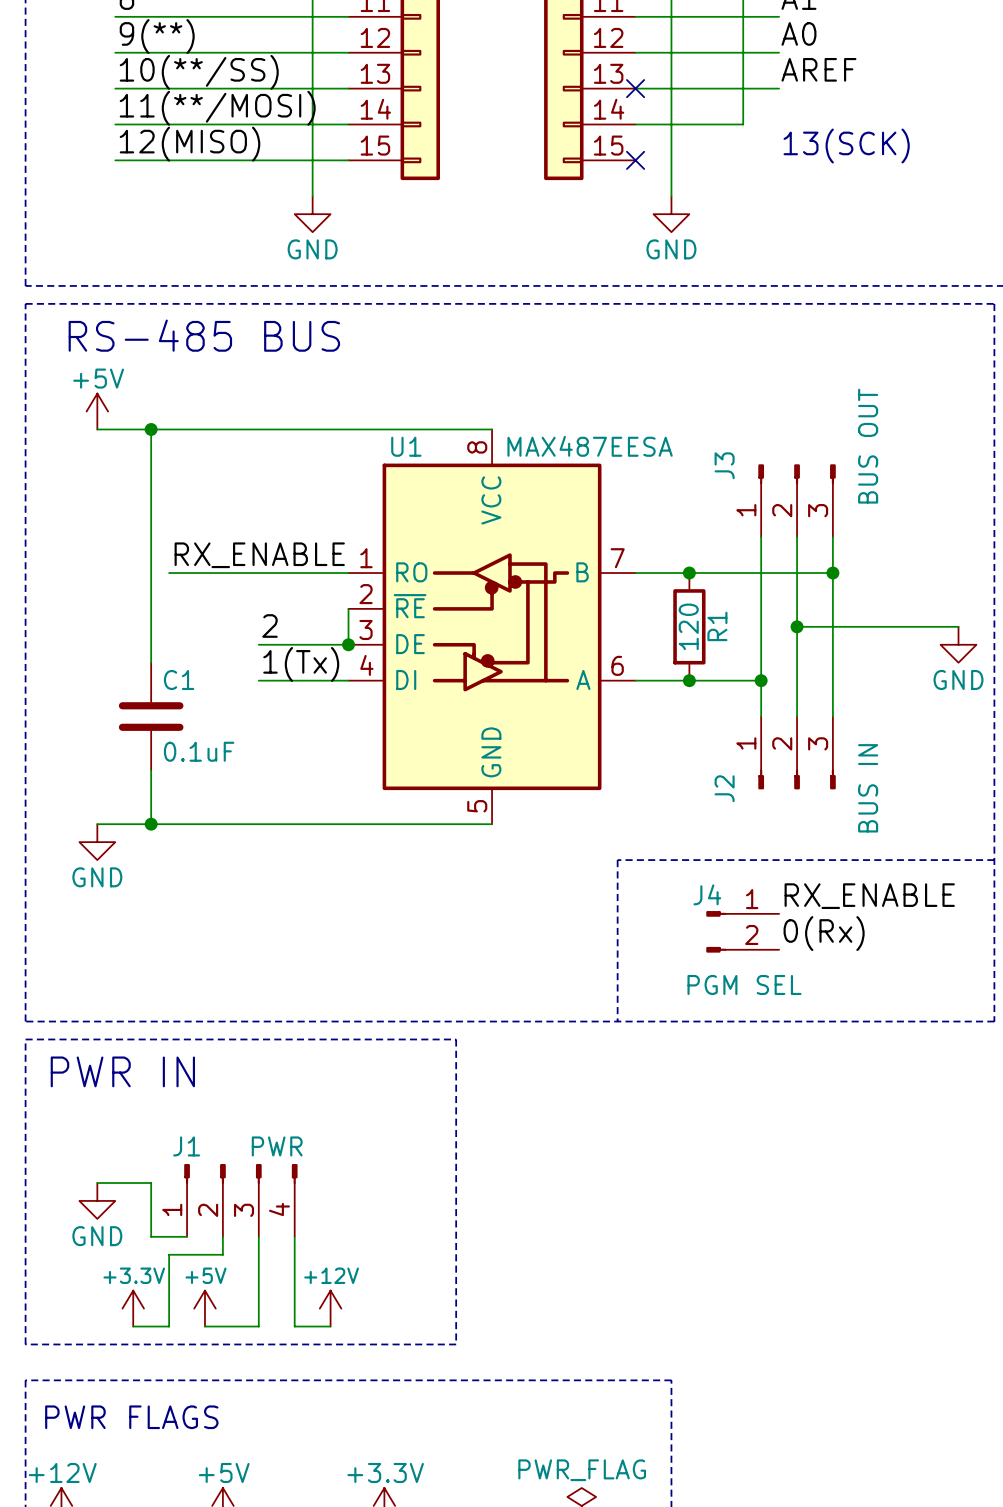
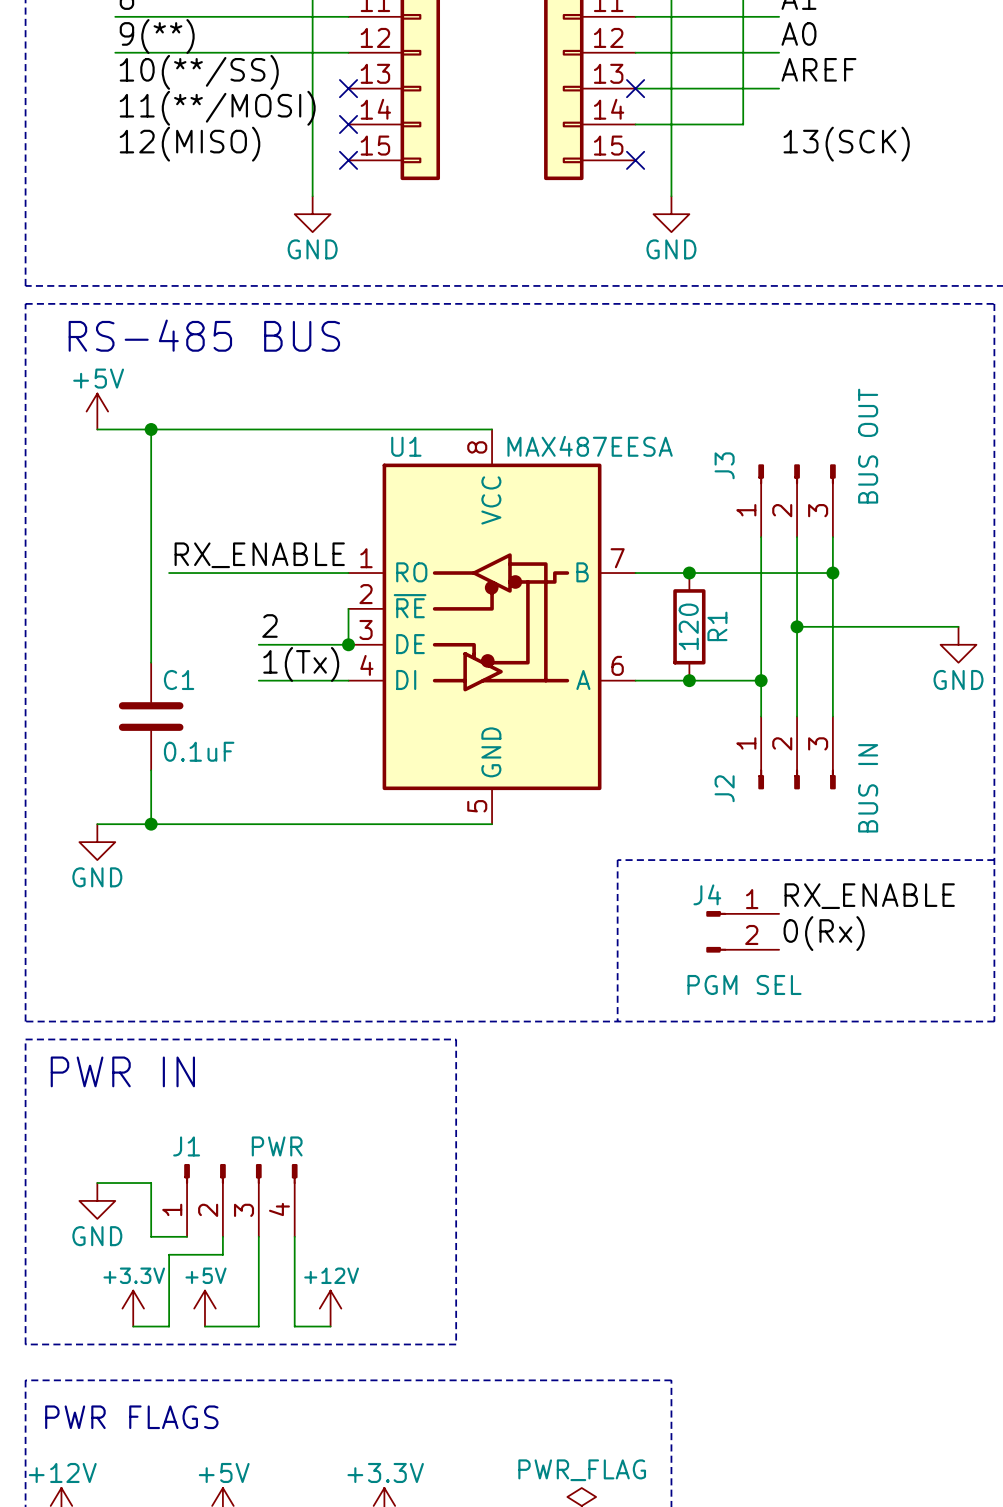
wire: (115, 88) (348, 88) -> none
no-connect mark: none -> (348, 88)
wire: (115, 124) (348, 124) -> none
no-connect mark: none -> (348, 124)
label: none -> 13(SCK) (846, 144)
text: 13(SCK) (846, 146) -> none
wire: (115, 160) (348, 160) -> none
no-connect mark: none -> (348, 160)

